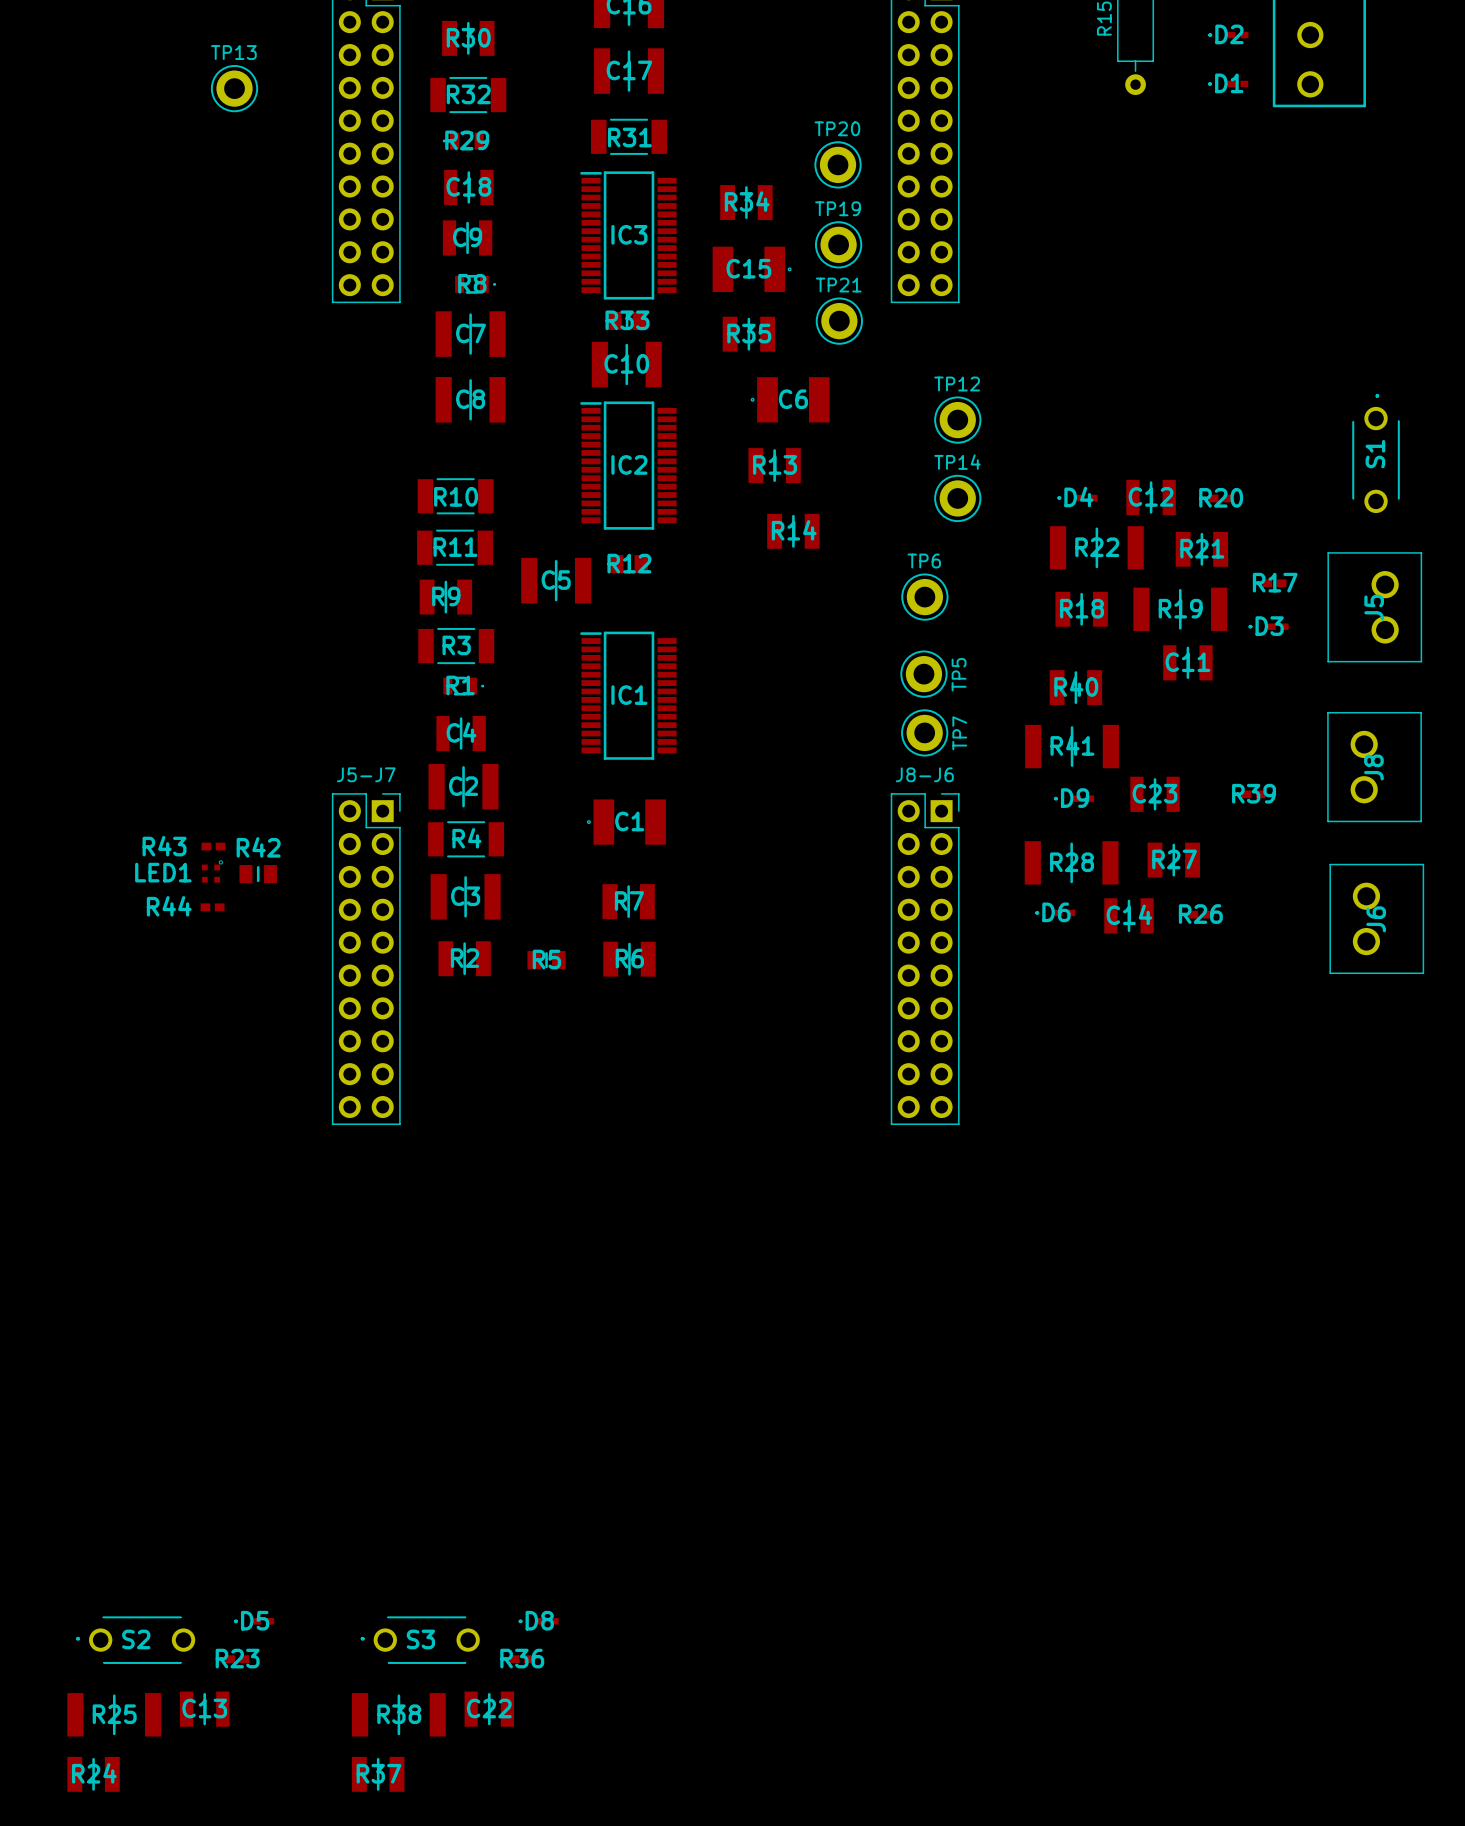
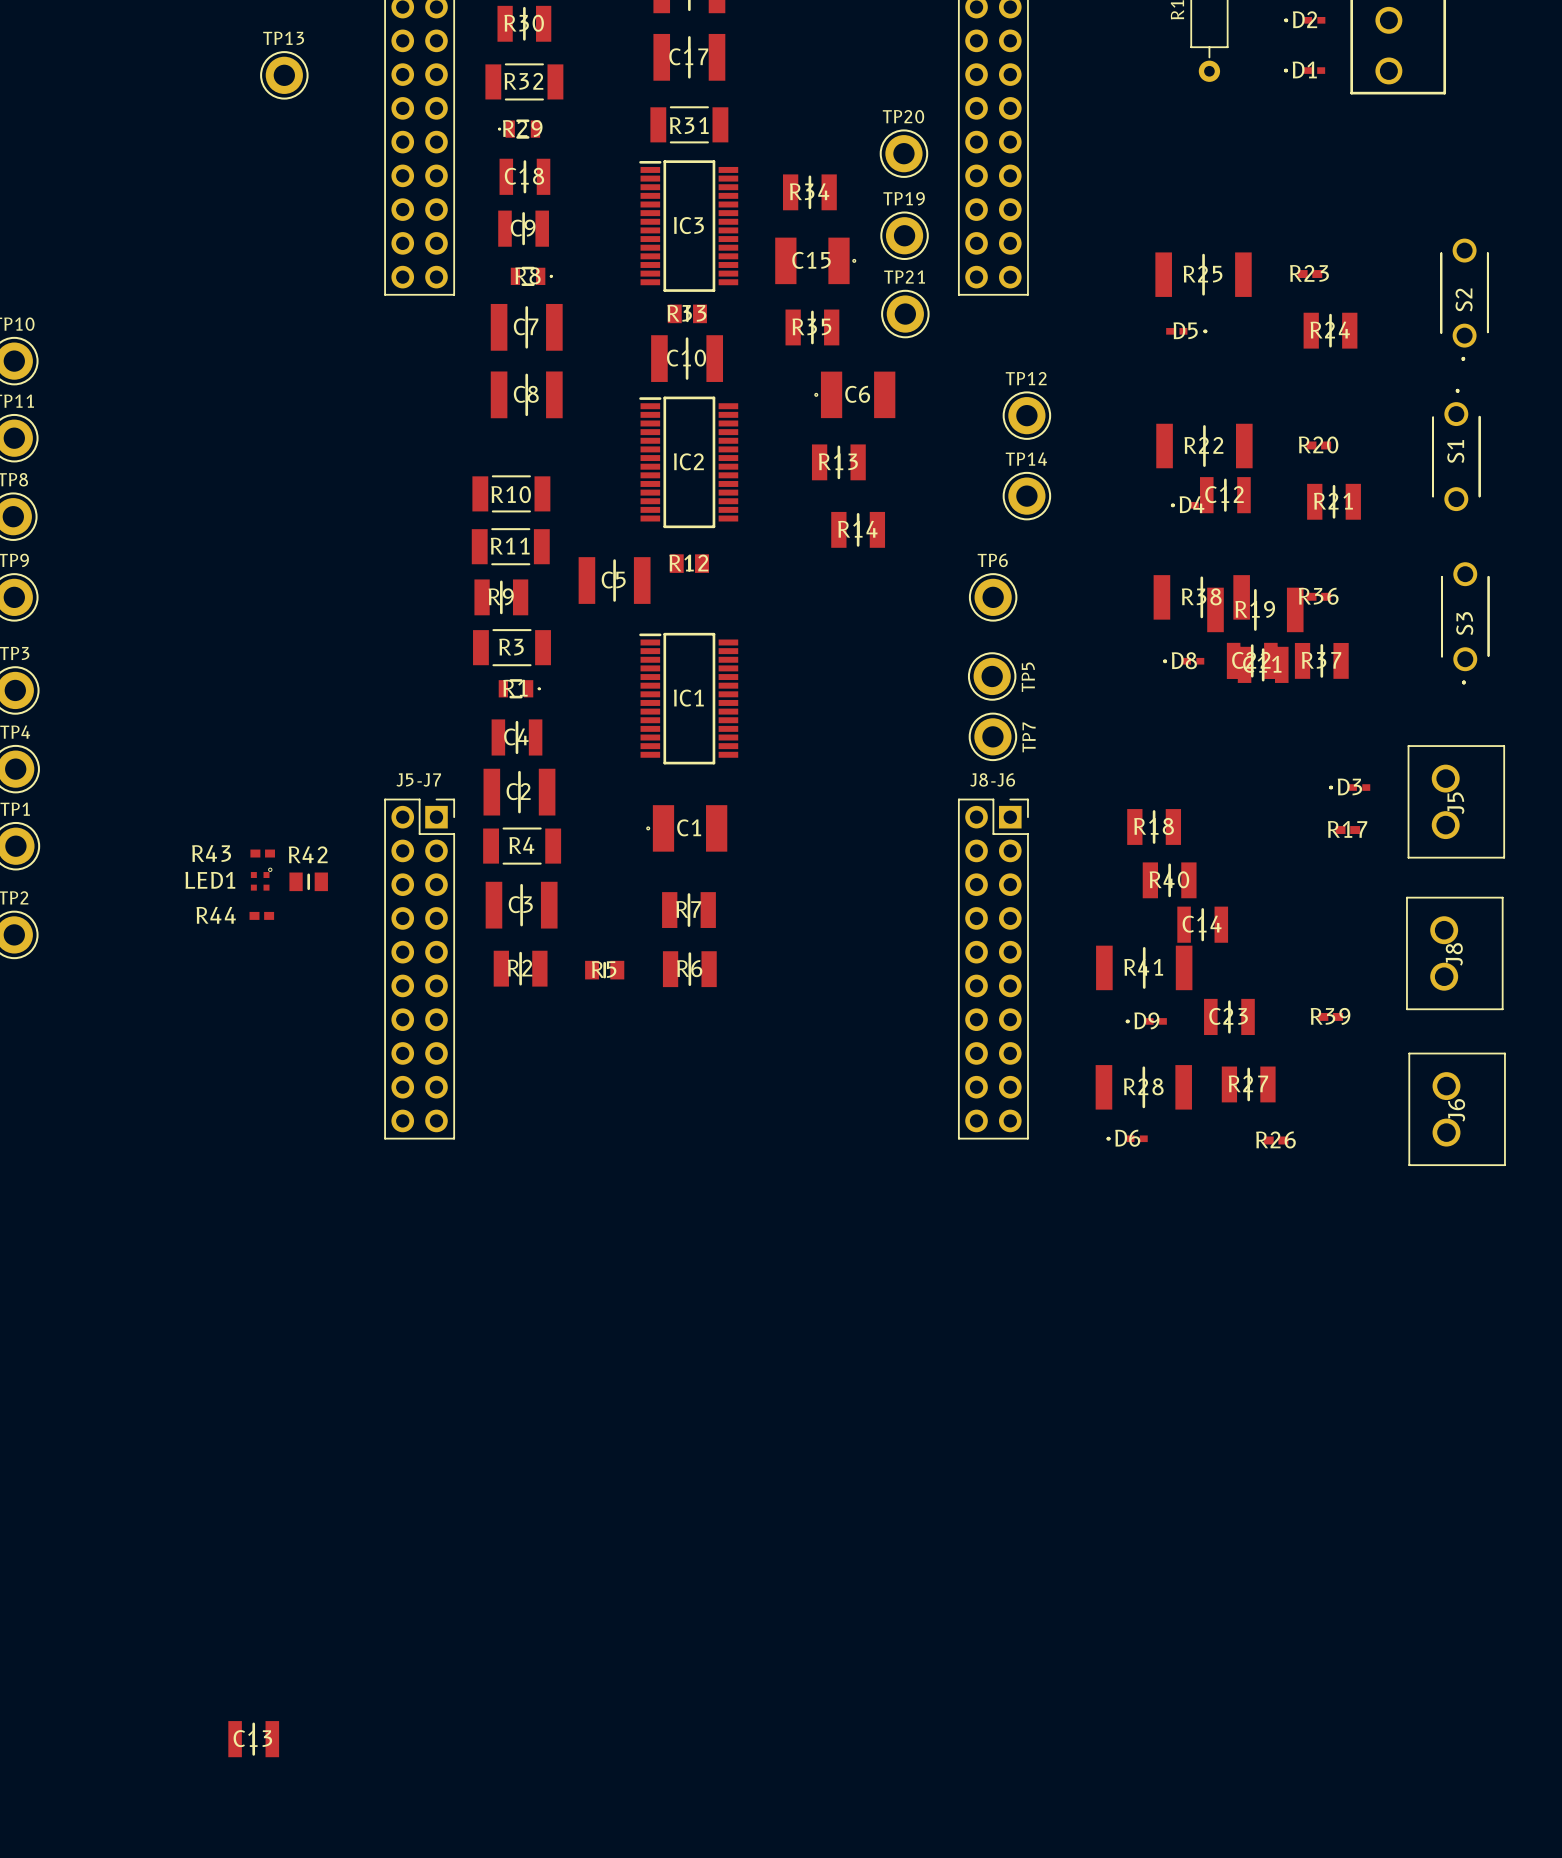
D4 position: (1077, 498) -> (1191, 505)
R20 position: (1220, 498) -> (1318, 445)
R22 position: (1096, 547) -> (1204, 446)
R21 position: (1201, 549) -> (1334, 501)
R17 position: (1274, 583) -> (1347, 830)
J5 rotation: 0° (1374, 607) -> 180° (1456, 801)
J5 position: (1374, 607) -> (1456, 801)
R18 position: (1081, 609) -> (1154, 826)
D3 position: (1268, 626) -> (1349, 787)
R40 position: (1075, 687) -> (1169, 880)
R41 position: (1072, 746) -> (1144, 967)
J8 position: (1374, 767) -> (1454, 953)
C23 position: (1155, 794) -> (1229, 1016)
R39 position: (1253, 794) -> (1330, 1016)
D9 position: (1074, 798) -> (1146, 1021)
R27 position: (1173, 860) -> (1248, 1084)
R28 position: (1071, 862) -> (1143, 1087)
D6 position: (1055, 912) -> (1127, 1138)
R26 position: (1200, 914) -> (1276, 1140)
J6 position: (1376, 918) -> (1457, 1109)
D5 rotation: 0° (254, 1621) -> 180° (1186, 331)
D5 position: (254, 1621) -> (1186, 331)
D8 position: (538, 1621) -> (1183, 661)
S2 rotation: 0° (135, 1640) -> 90° counterclockwise (1464, 299)
S2 position: (135, 1640) -> (1464, 299)
S3 rotation: 0° (420, 1640) -> 90° counterclockwise (1465, 623)
S3 position: (420, 1640) -> (1465, 623)
R23 position: (237, 1659) -> (1309, 274)
R36 position: (521, 1659) -> (1318, 596)
C22 position: (489, 1709) -> (1252, 660)
R25 position: (114, 1714) -> (1203, 274)
R38 position: (398, 1714) -> (1201, 597)
R24 position: (93, 1774) -> (1330, 330)
R37 position: (378, 1774) -> (1321, 660)

